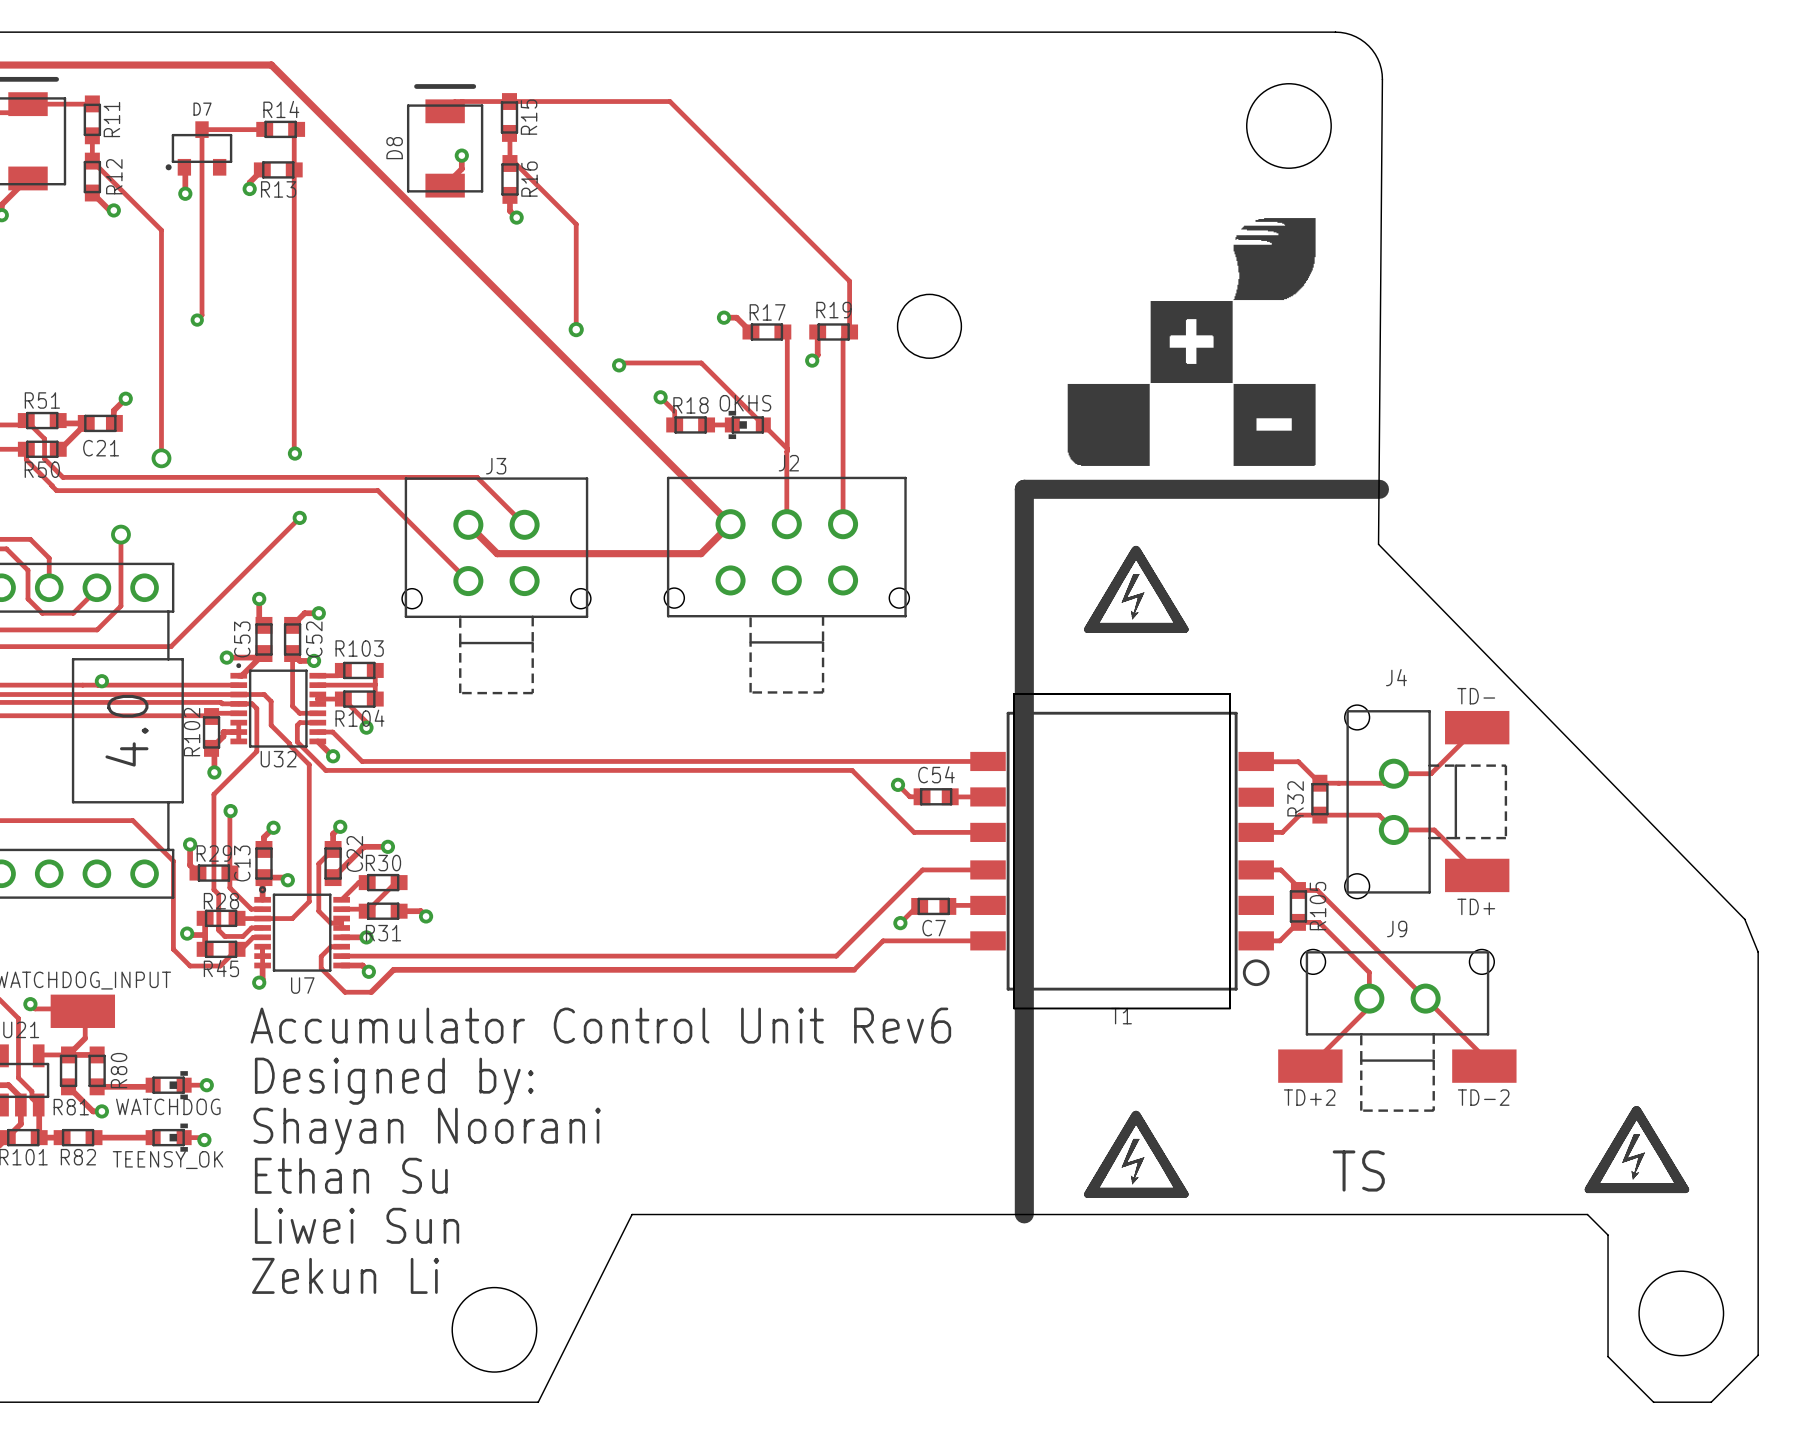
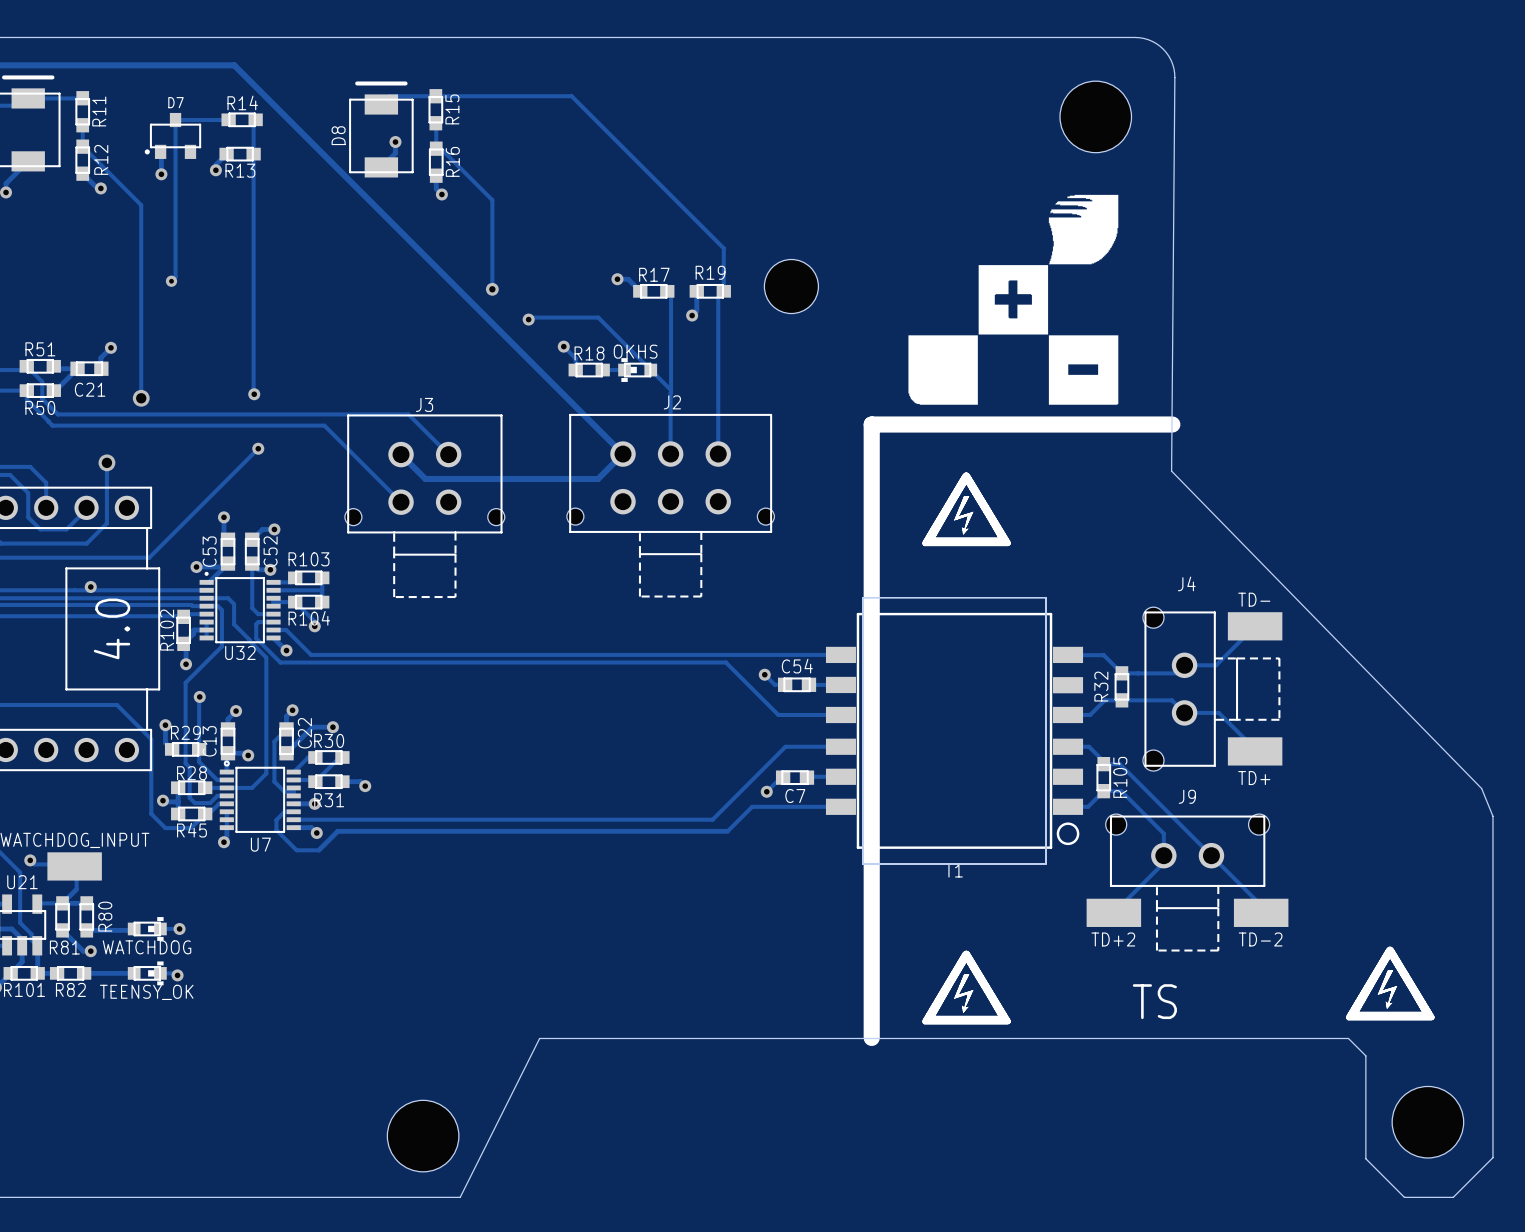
text: Accumulator Control Unit Rev6 (600, 1025) -> none
text: Designed by: (394, 1081) -> none
text: Shayan Noorani (427, 1131) -> none
text: Ethan Su (351, 1175) -> none
text: Liwei Sun (357, 1225) -> none
text: Zekun Li (345, 1275) -> none

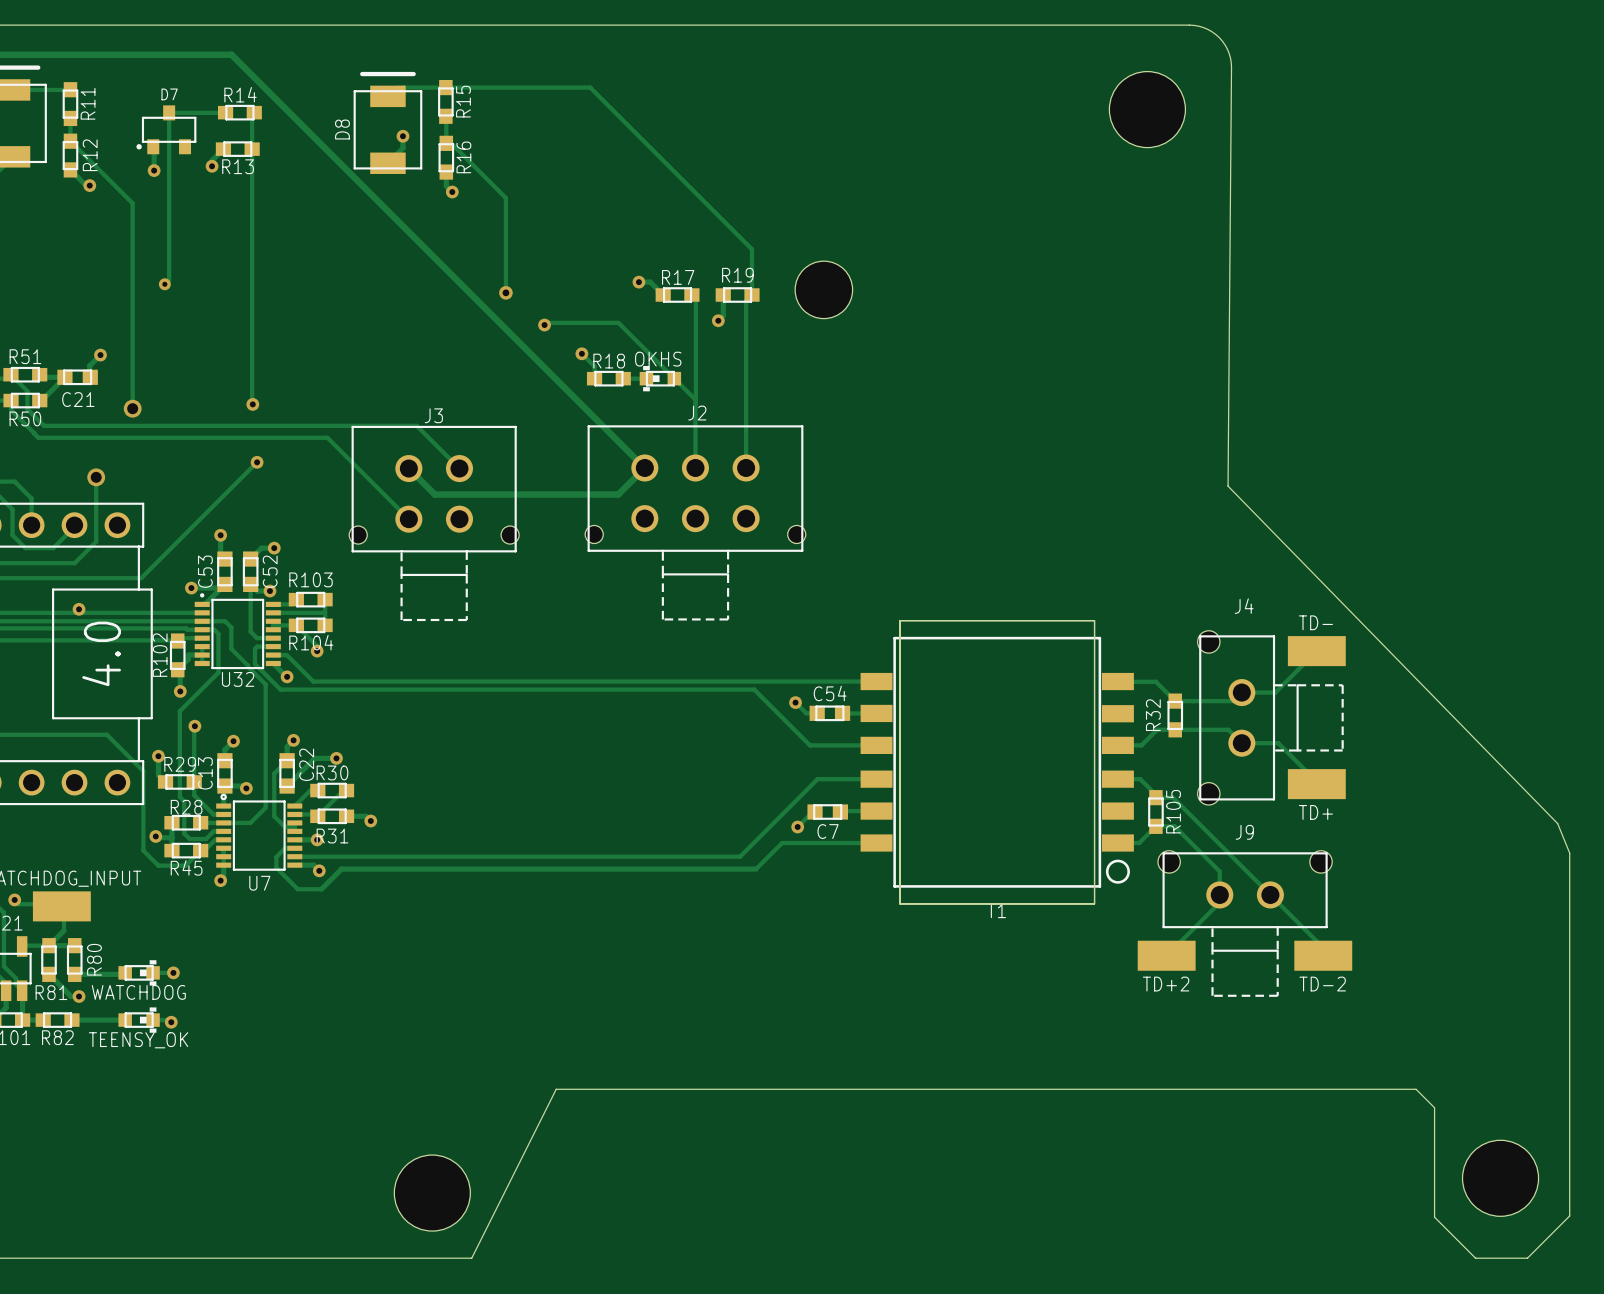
drawing: [908, 194, 1119, 405] -> none
line: (1172, 424) (871, 424) (871, 1037) -> none
drawing: [922, 472, 1011, 547] -> none
drawing: [1346, 946, 1435, 1021] -> none
drawing: [922, 950, 1011, 1025] -> none
drawing: [1132, 984, 1177, 1020] -> none

